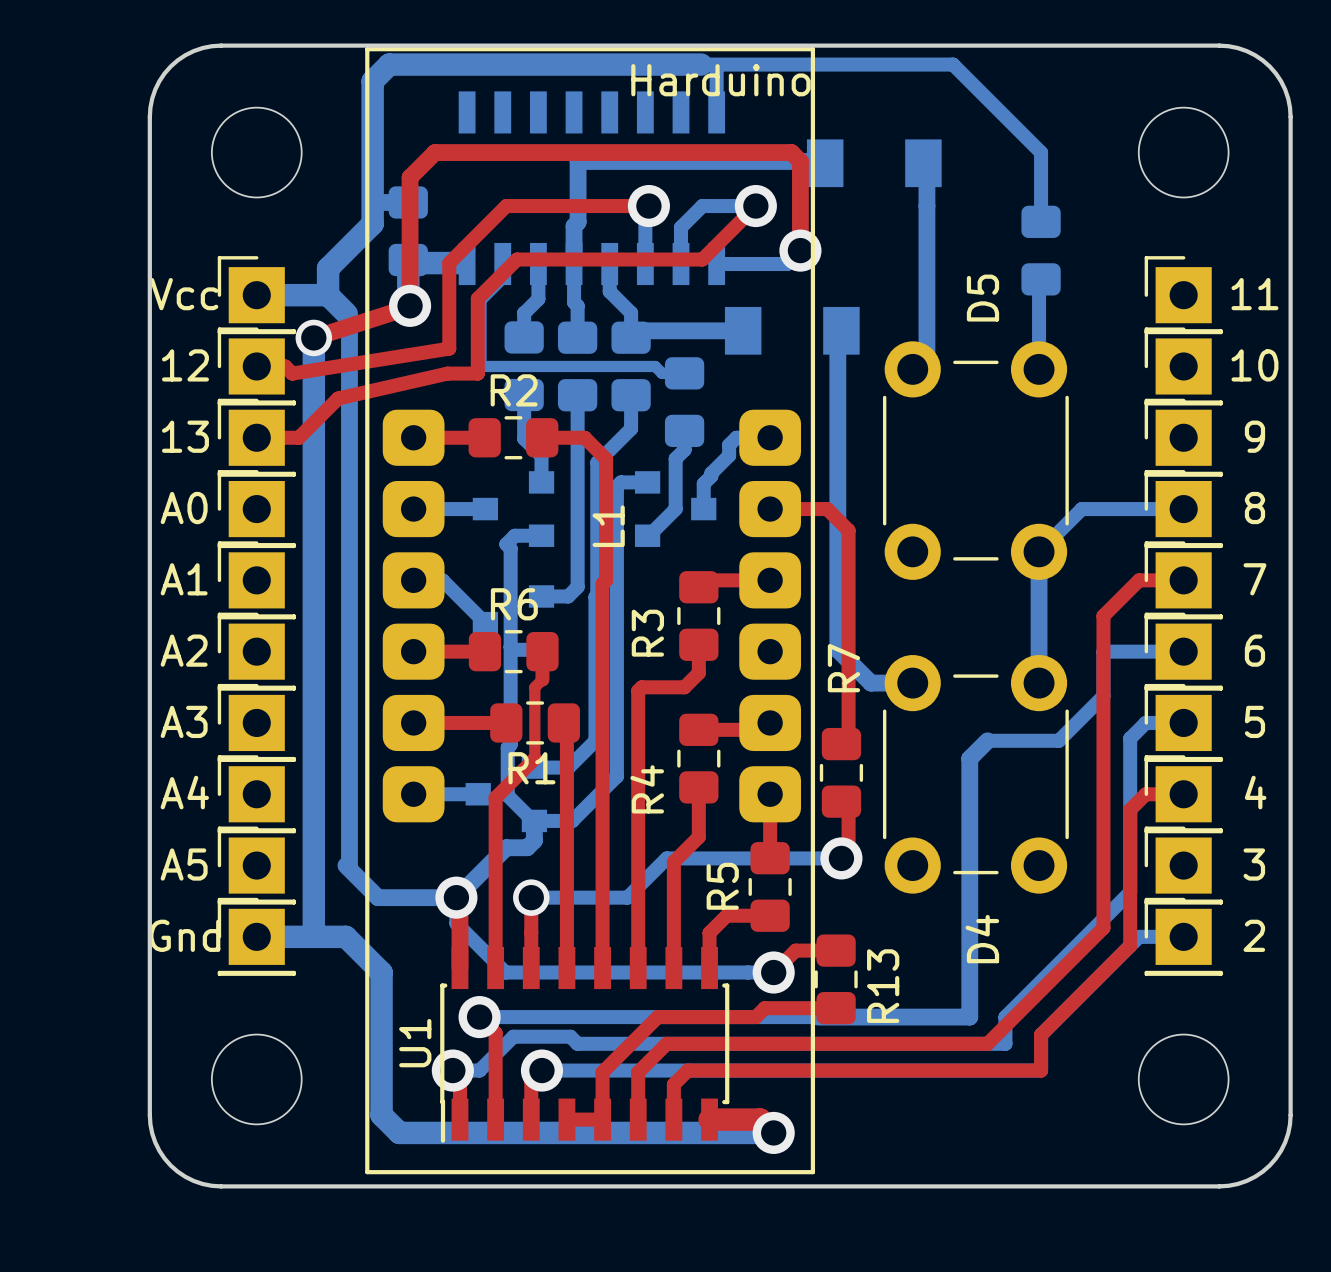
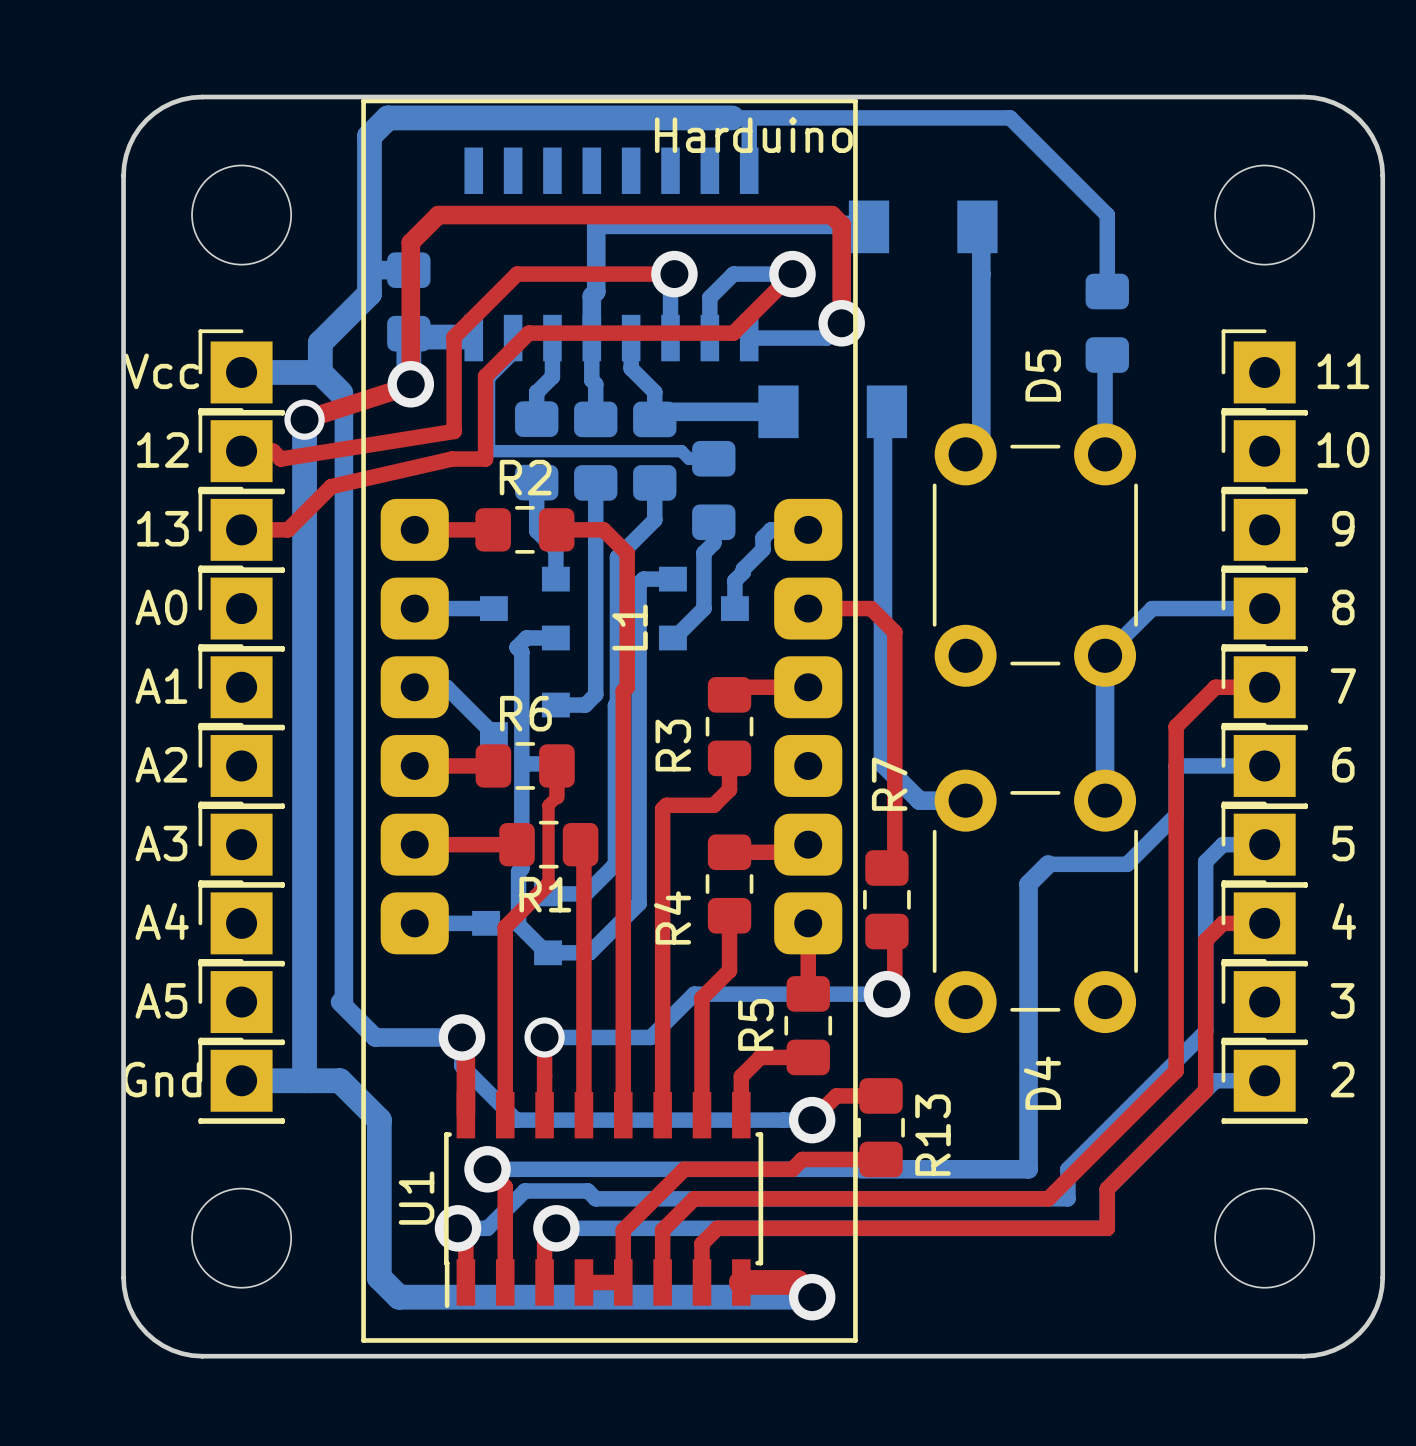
bottom track: (534, 820) (534, 840) (527, 847) (506, 847) (456, 897) -> none

